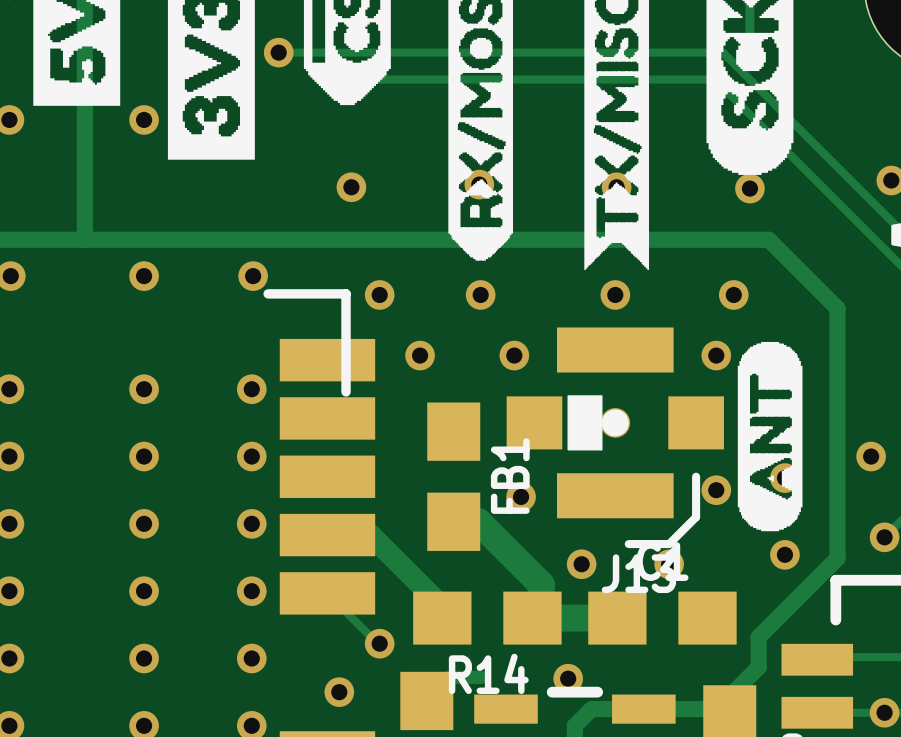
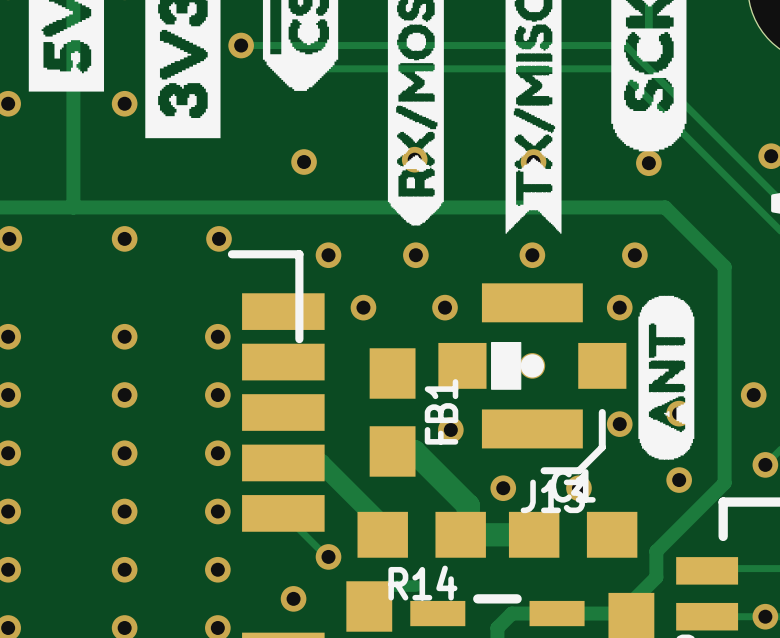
via: (568, 678) -> none

